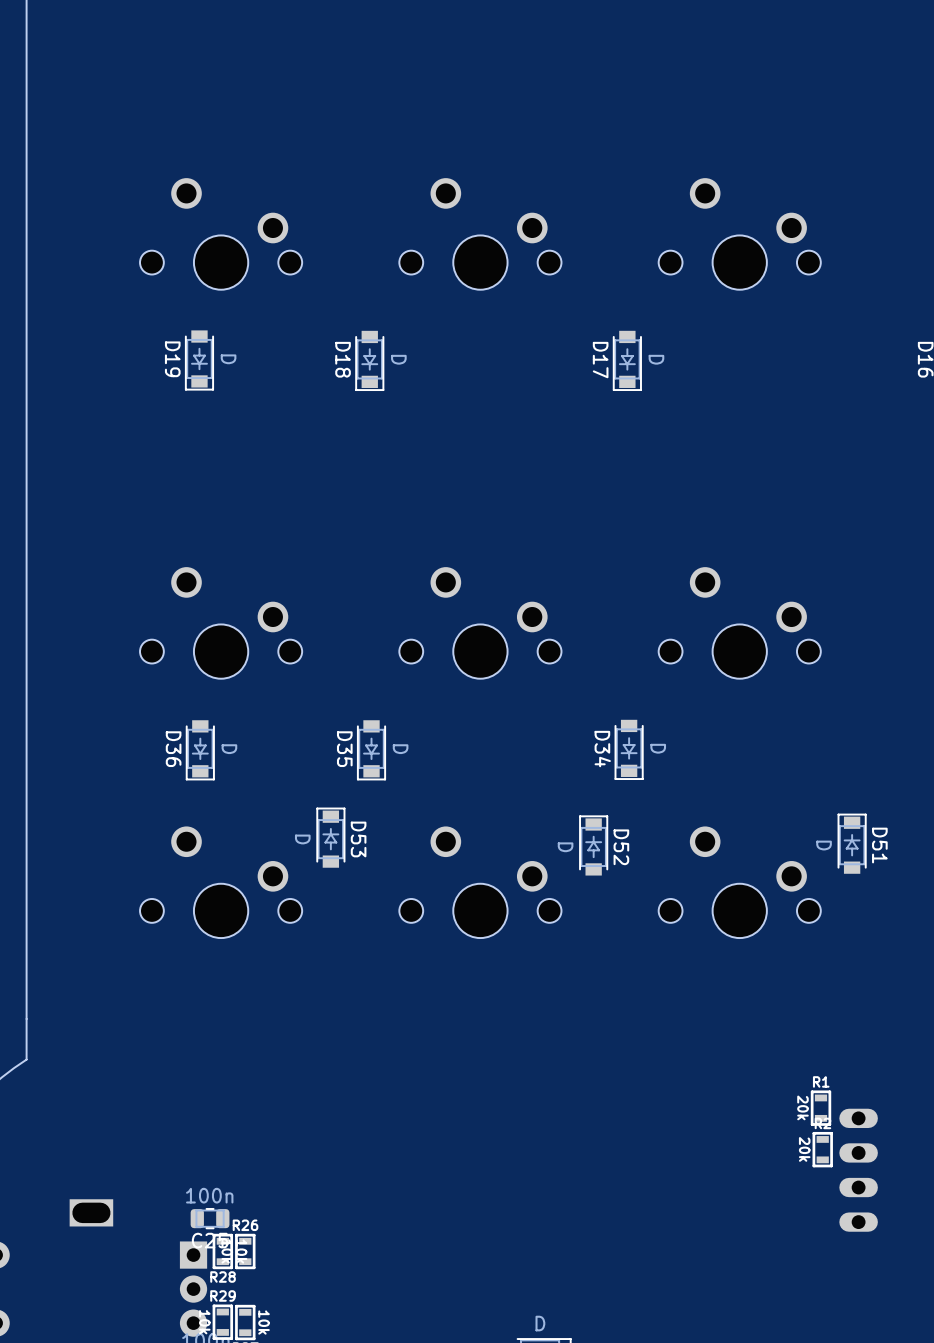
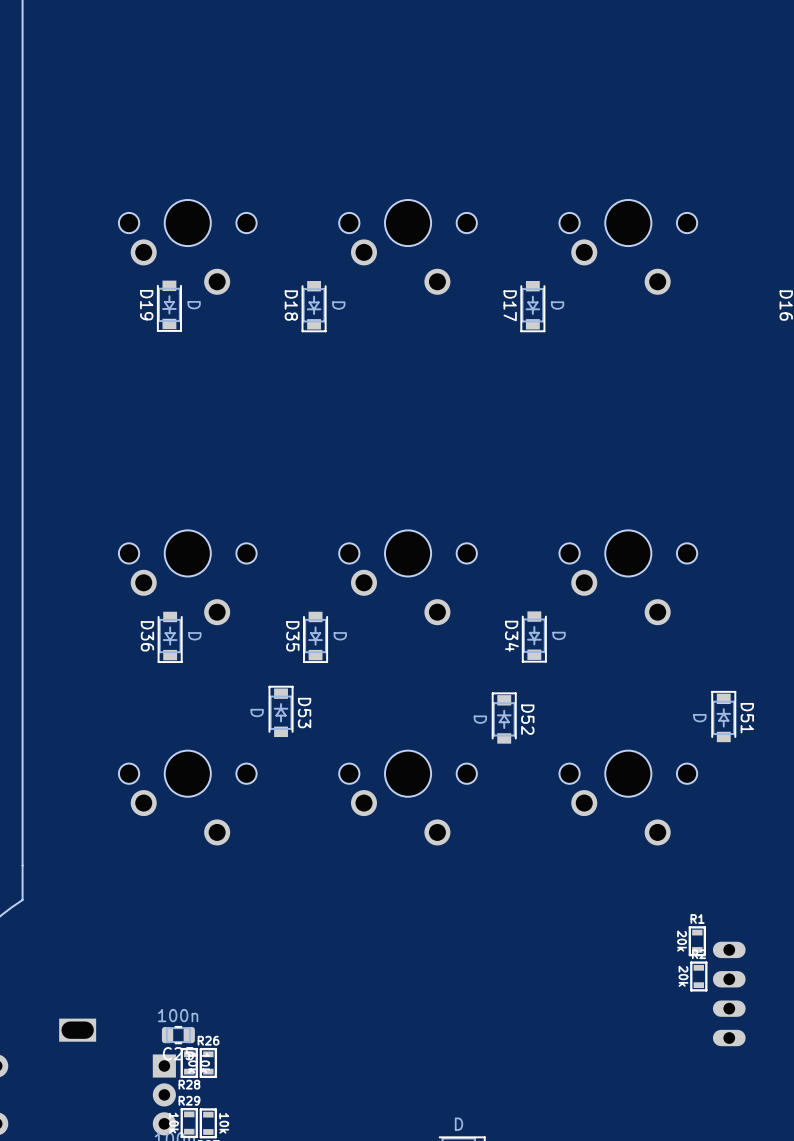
part rotation: 0° (221, 233) -> 180° (187, 247)
part rotation: 0° (480, 233) -> 180° (408, 247)
part rotation: 0° (739, 233) -> 180° (628, 247)
part rotation: 0° (221, 622) -> 180° (187, 577)
part rotation: 0° (480, 622) -> 180° (408, 577)
part rotation: 0° (739, 622) -> 180° (628, 577)
part rotation: 0° (221, 882) -> 180° (187, 798)
part rotation: 0° (480, 882) -> 180° (408, 798)
part rotation: 0° (739, 882) -> 180° (628, 798)

